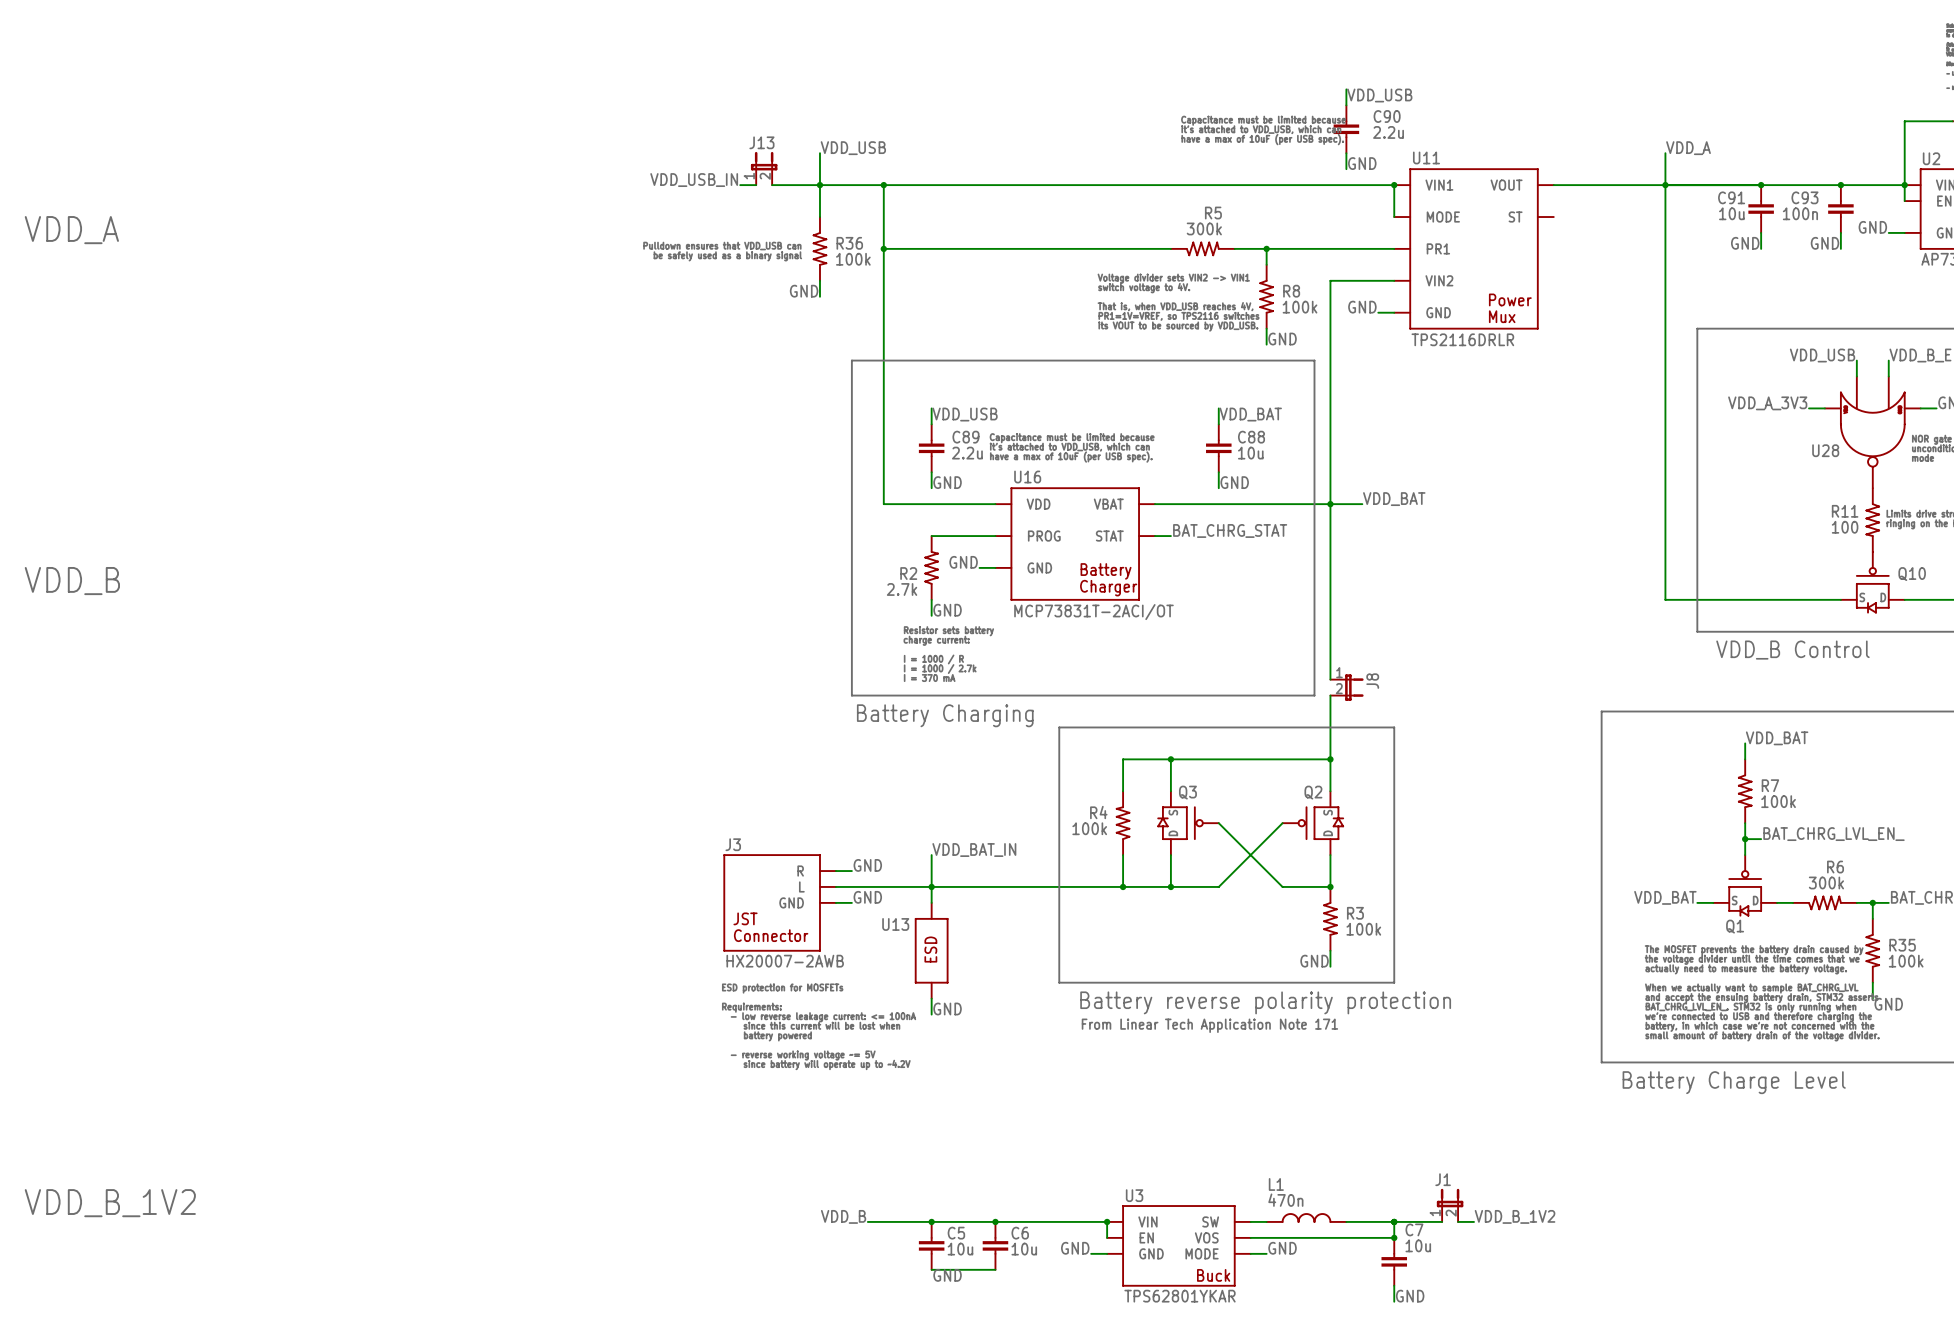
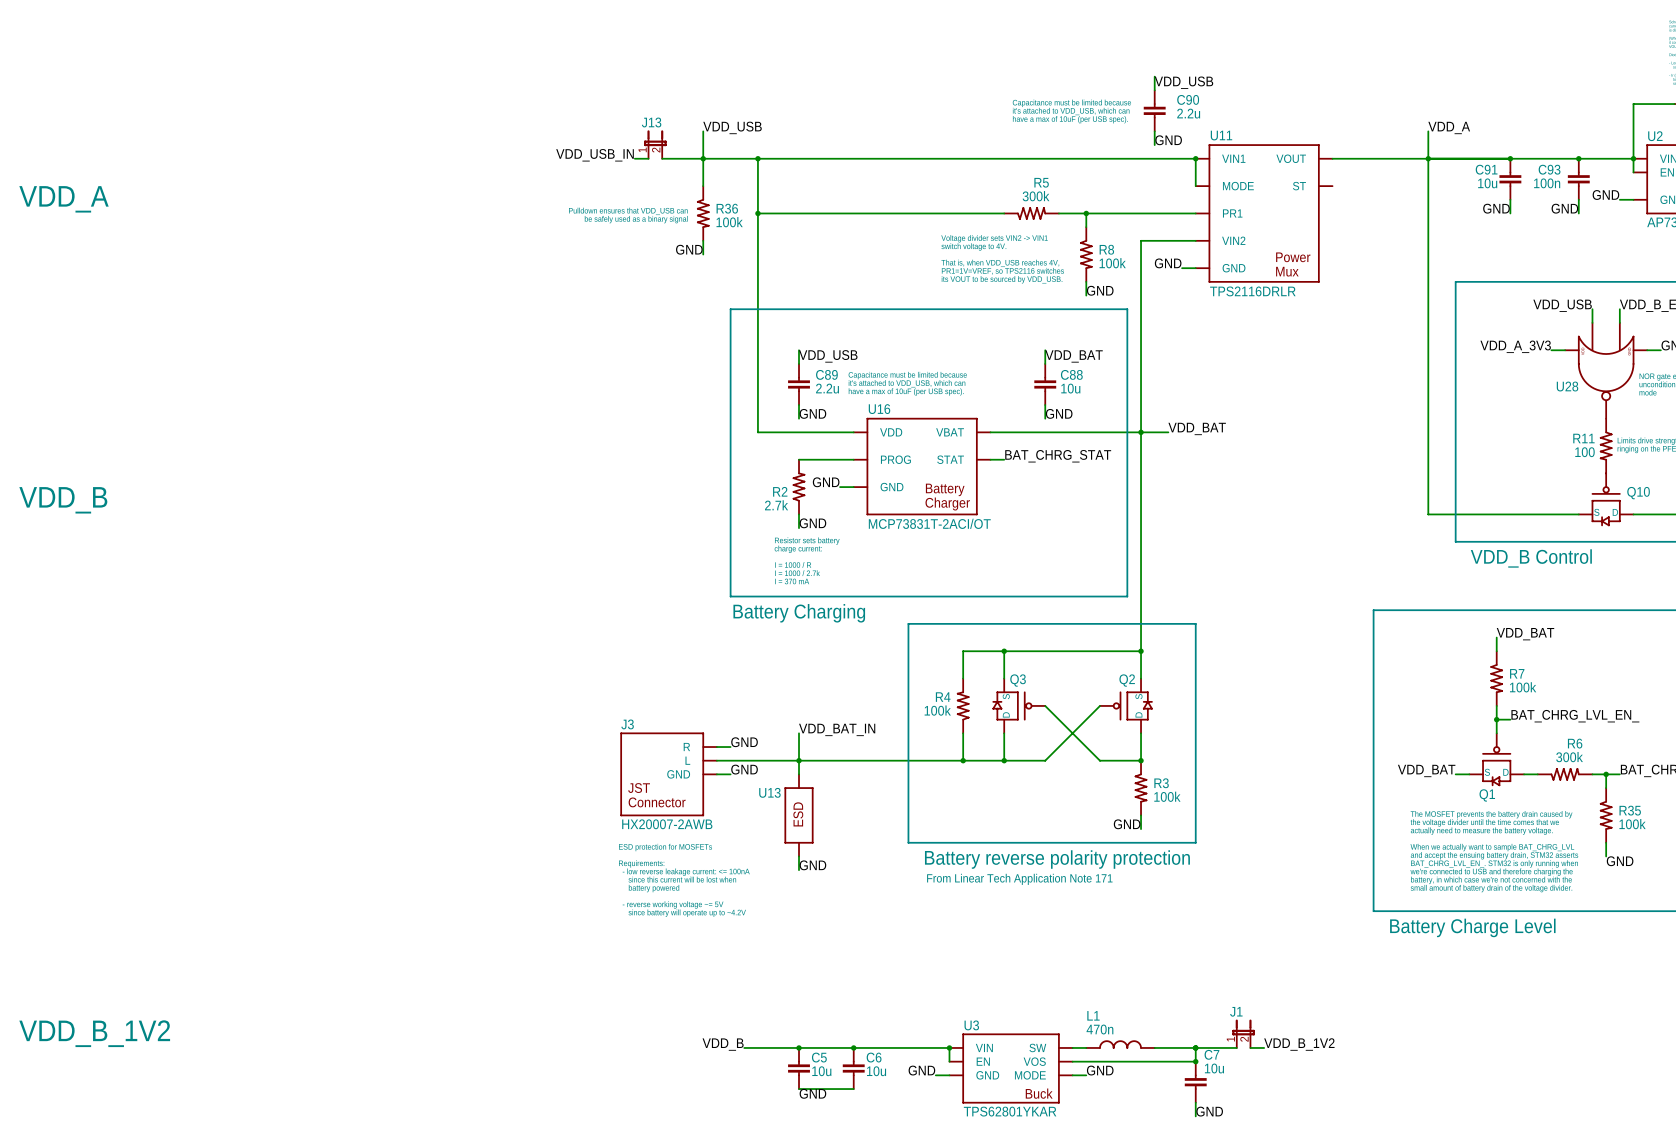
wire: none -> (1141, 582) (1141, 596)
J8: (1347, 687) -> none

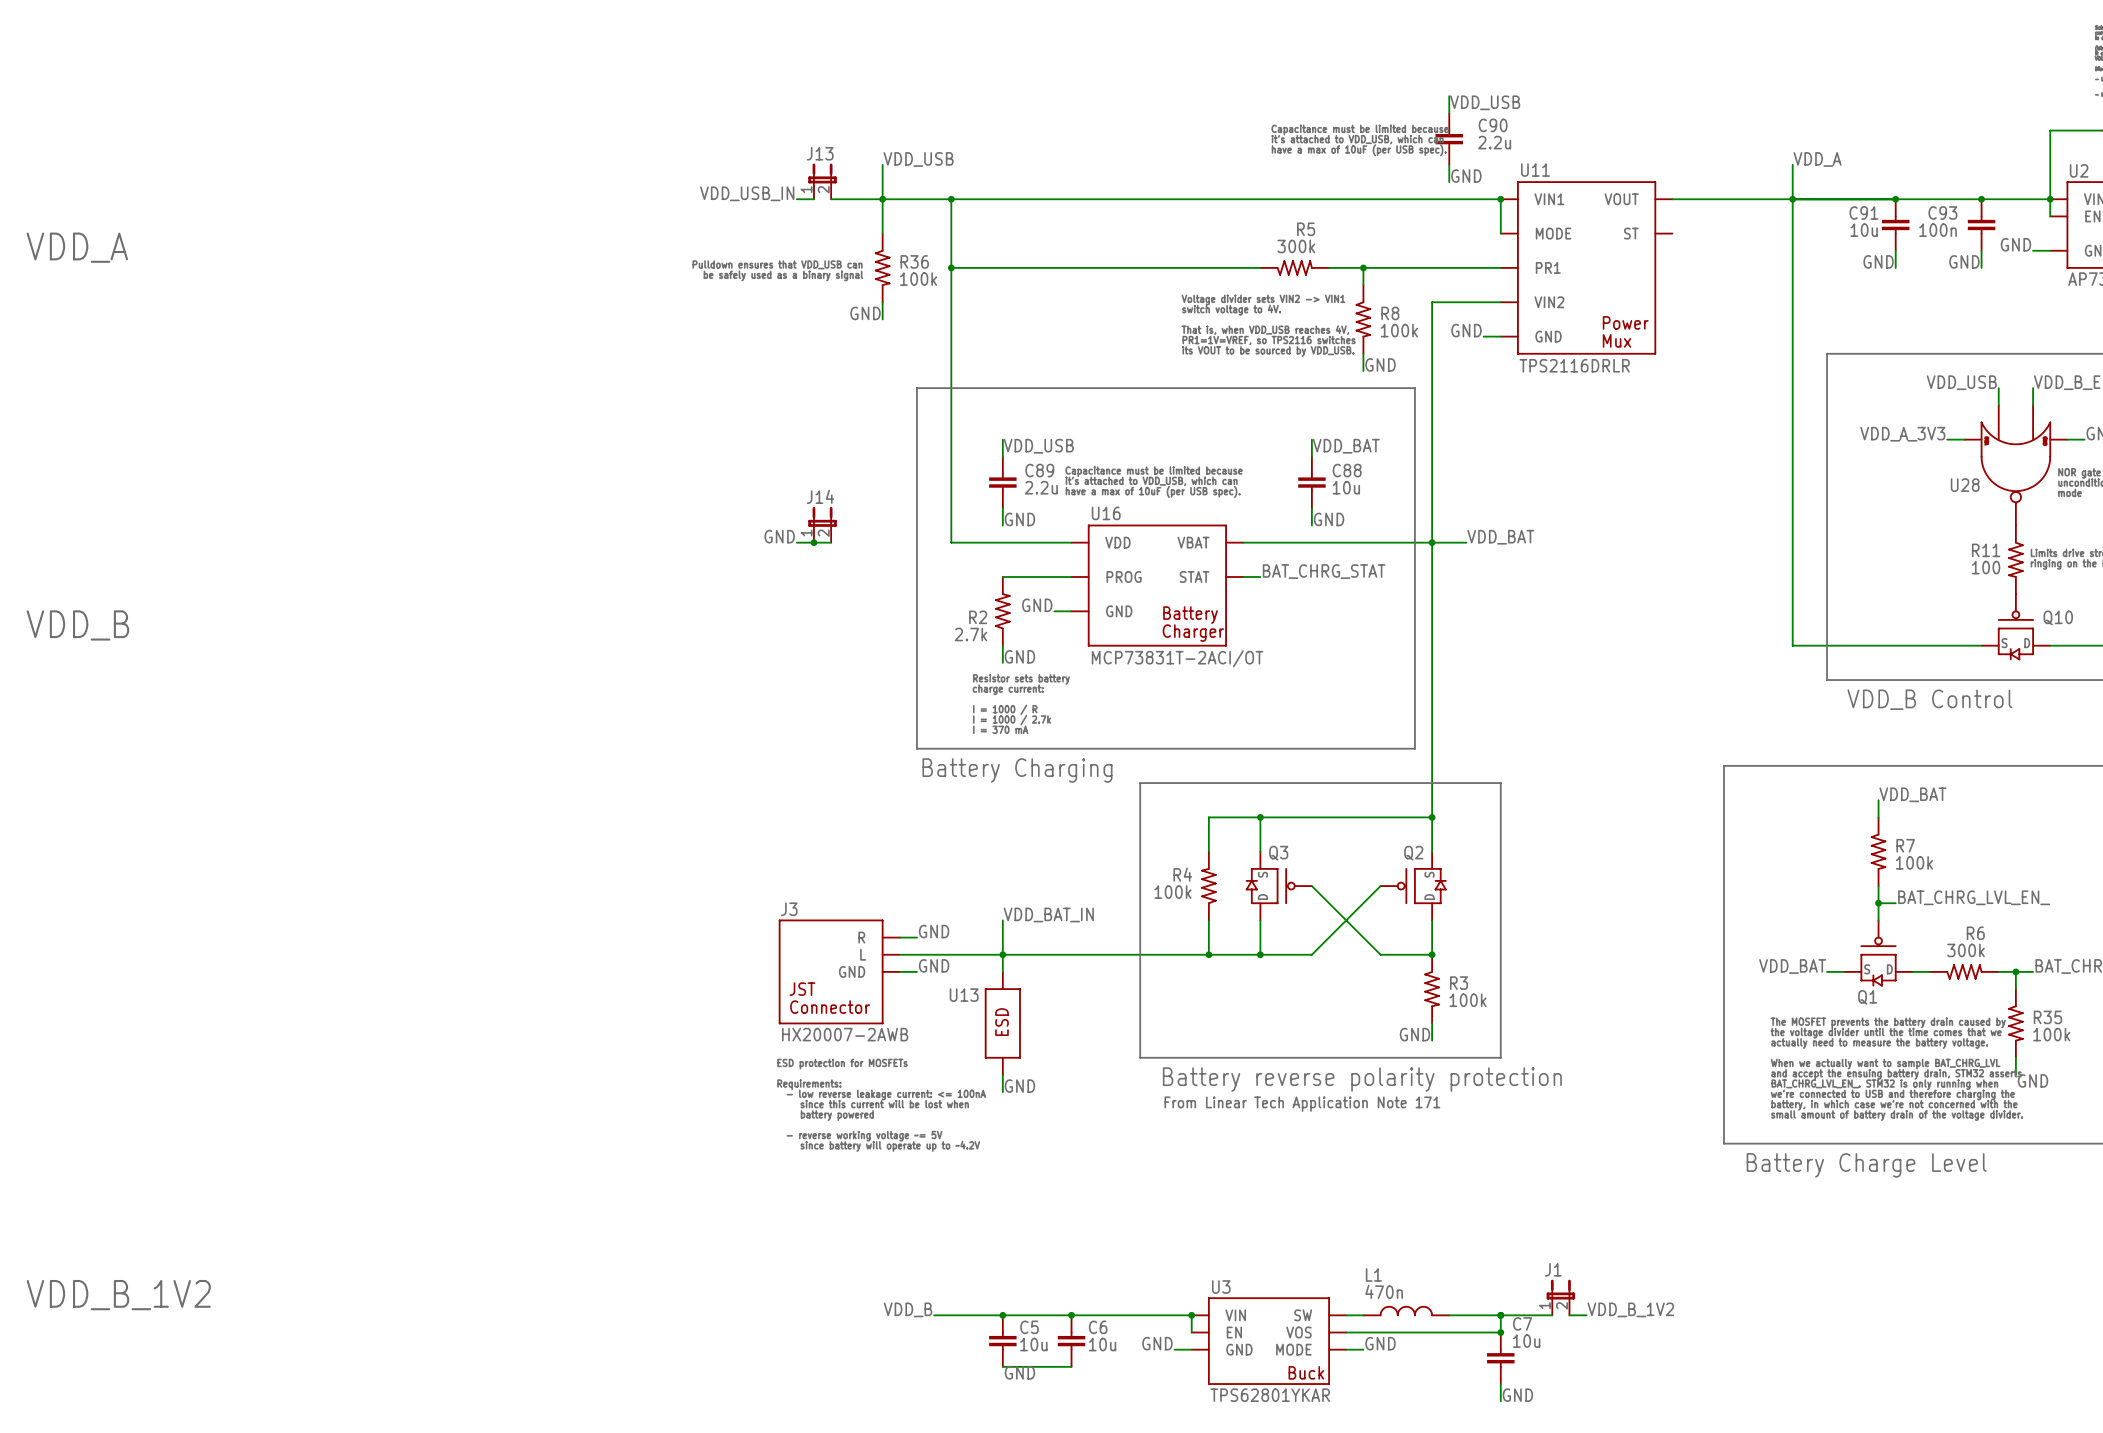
J14: none -> (822, 524)
label: none -> GND (779, 536)
wire: none -> (796, 542) (831, 542)
junction: none -> (813, 542)

